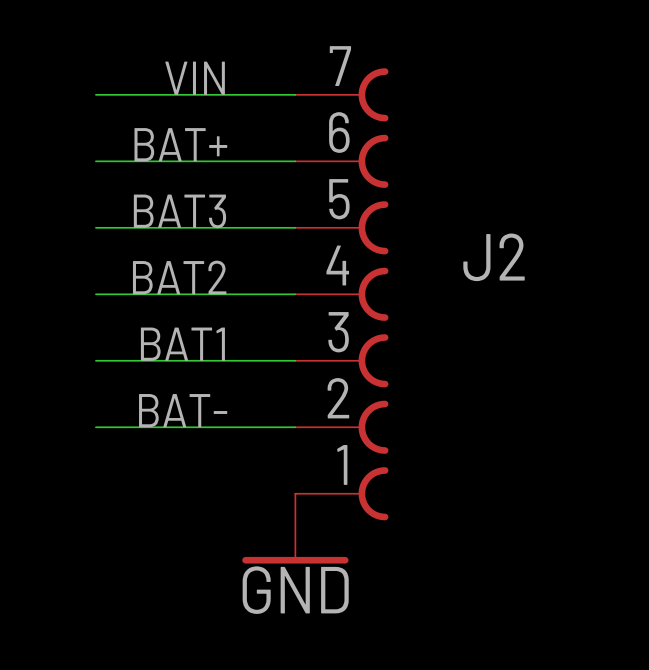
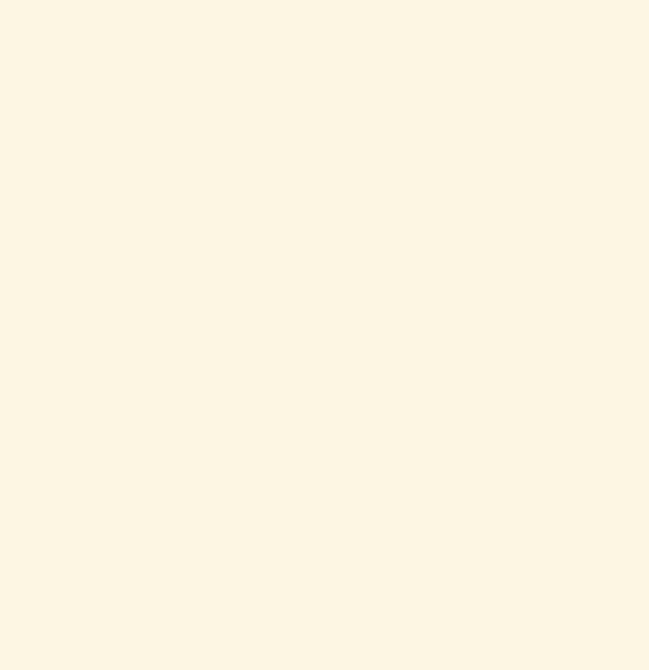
label: VIN (195, 78) -> none
wire: (95, 94) (295, 94) -> none
label: BAT+ (180, 144) -> none
wire: (95, 161) (295, 161) -> none
label: BAT3 (179, 211) -> none
wire: (95, 227) (295, 227) -> none
label: BAT2 (179, 277) -> none
wire: (95, 294) (295, 294) -> none
J2: (341, 294) -> none
label: BAT1 (182, 344) -> none
wire: (95, 360) (295, 360) -> none
label: BAT- (183, 410) -> none
wire: (95, 427) (295, 427) -> none
power symbol: GND (295, 528) -> none

